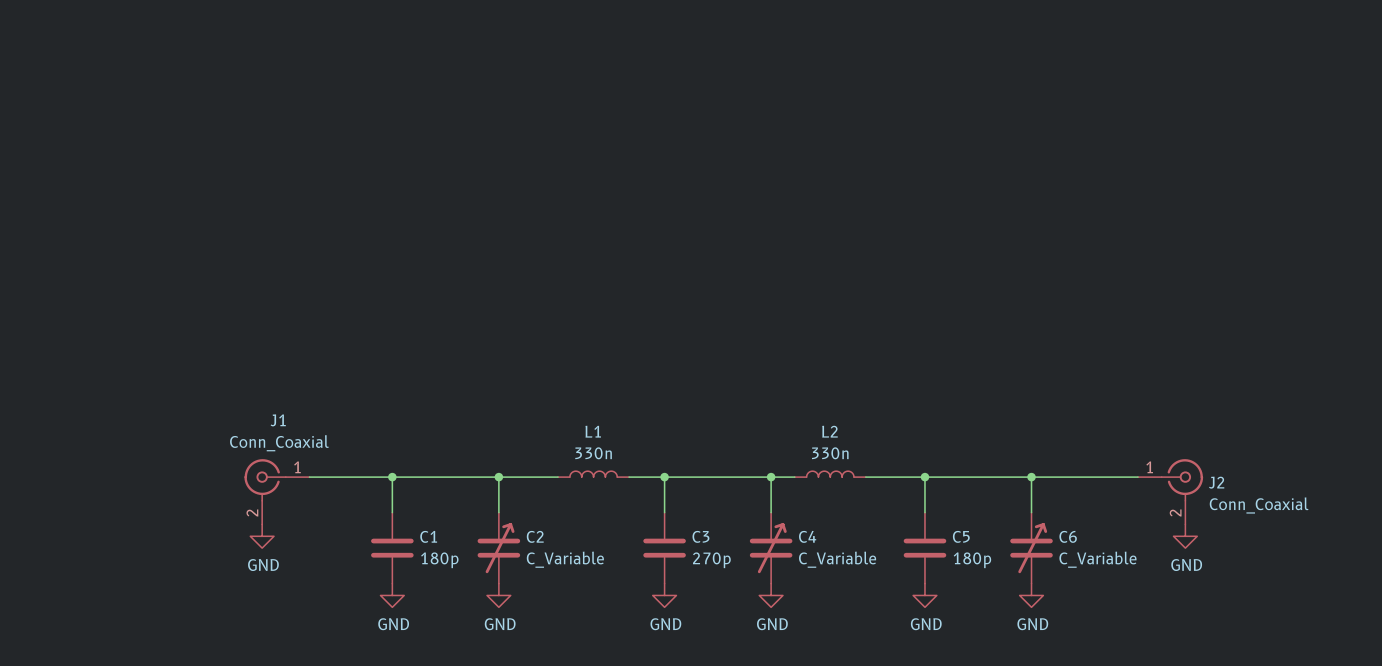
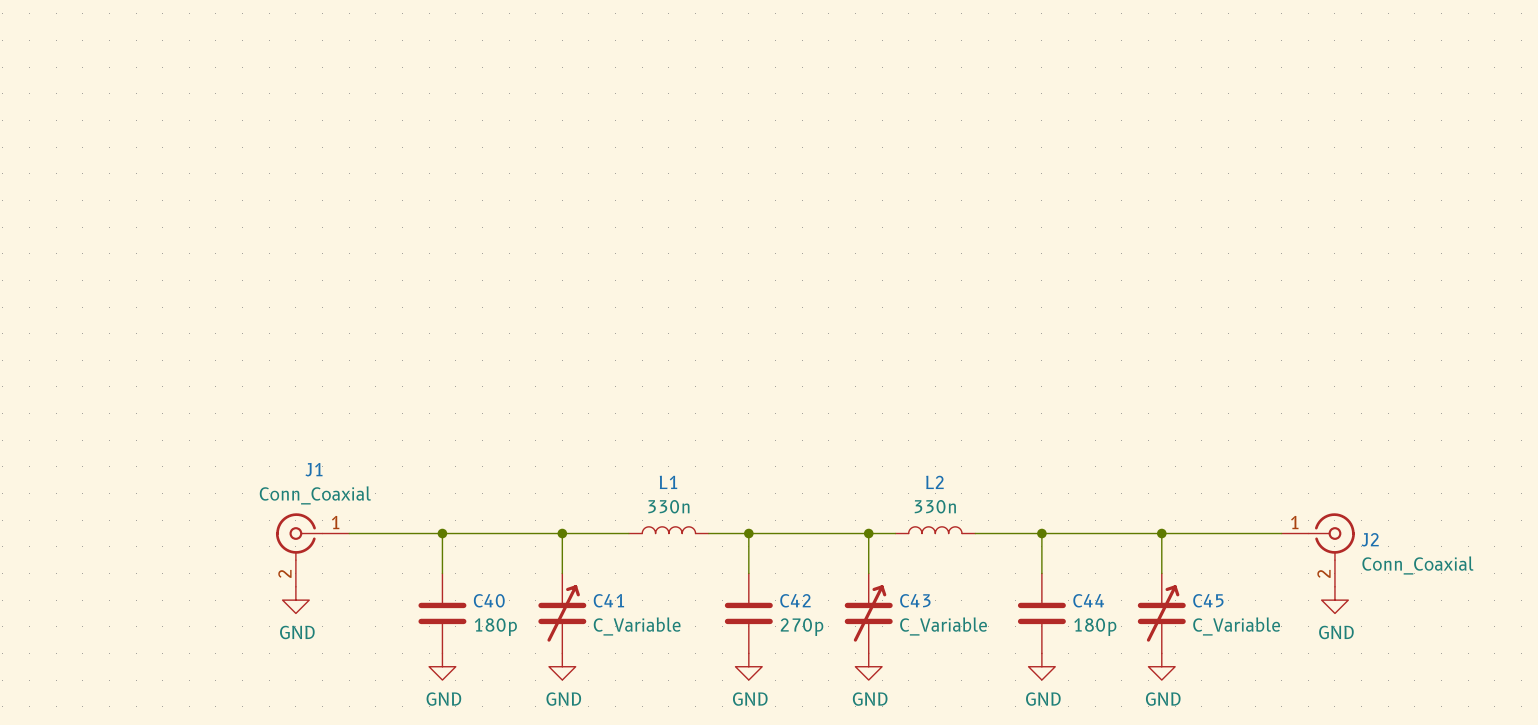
C1 name: C1 (428, 536) -> C40 (489, 600)
C2 name: C2 (535, 536) -> C41 (608, 600)
C3 name: C3 (700, 536) -> C42 (795, 600)
C4 name: C4 (807, 536) -> C43 (915, 600)
C5 name: C5 (961, 536) -> C44 (1088, 600)
C6 name: C6 (1068, 536) -> C45 (1208, 600)

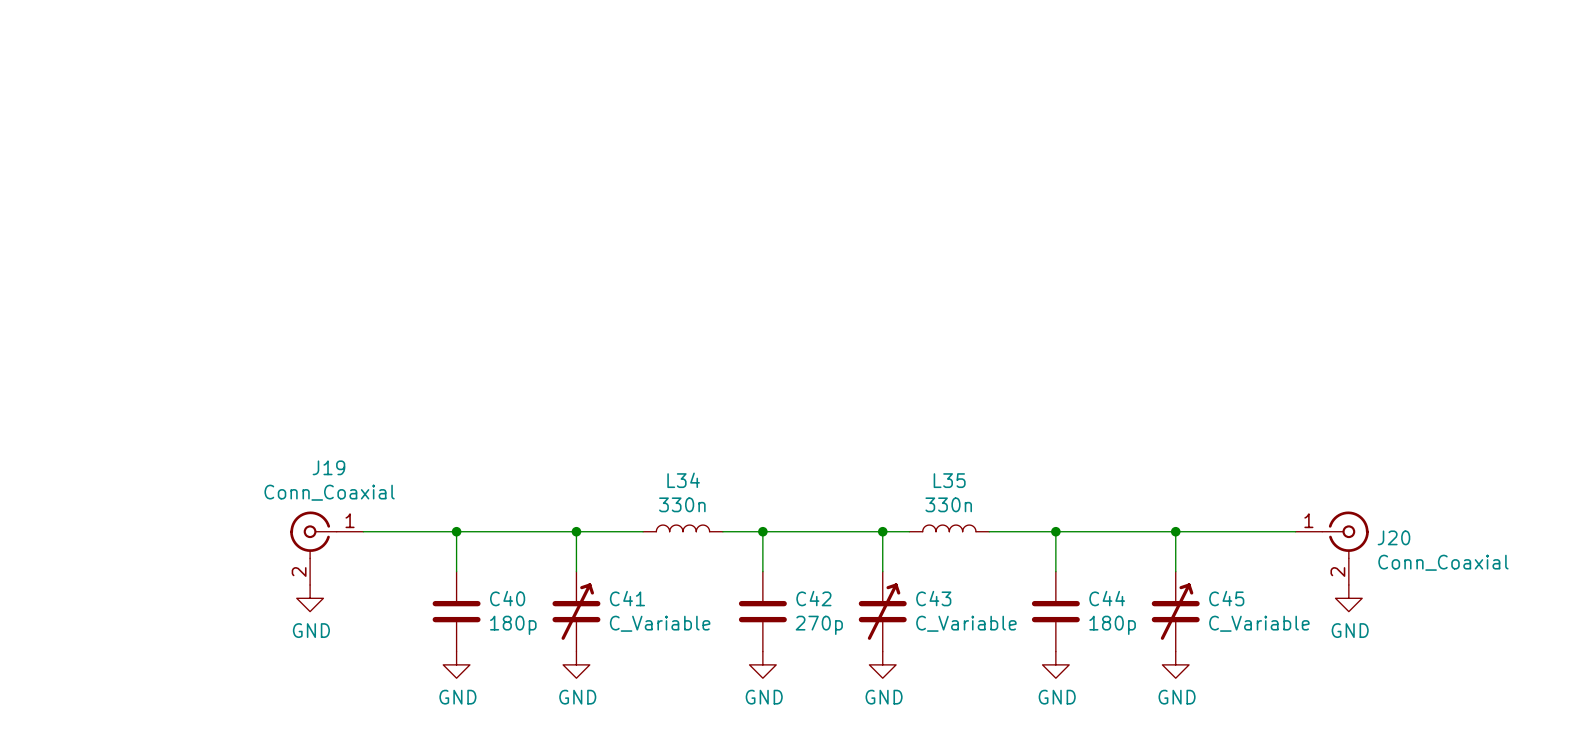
J1 name: J1 (313, 469) -> J19 (328, 467)
L1 name: L1 (668, 482) -> L34 (683, 480)
L2 name: L2 (934, 482) -> L35 (949, 480)
J2 name: J2 (1370, 539) -> J20 (1393, 537)

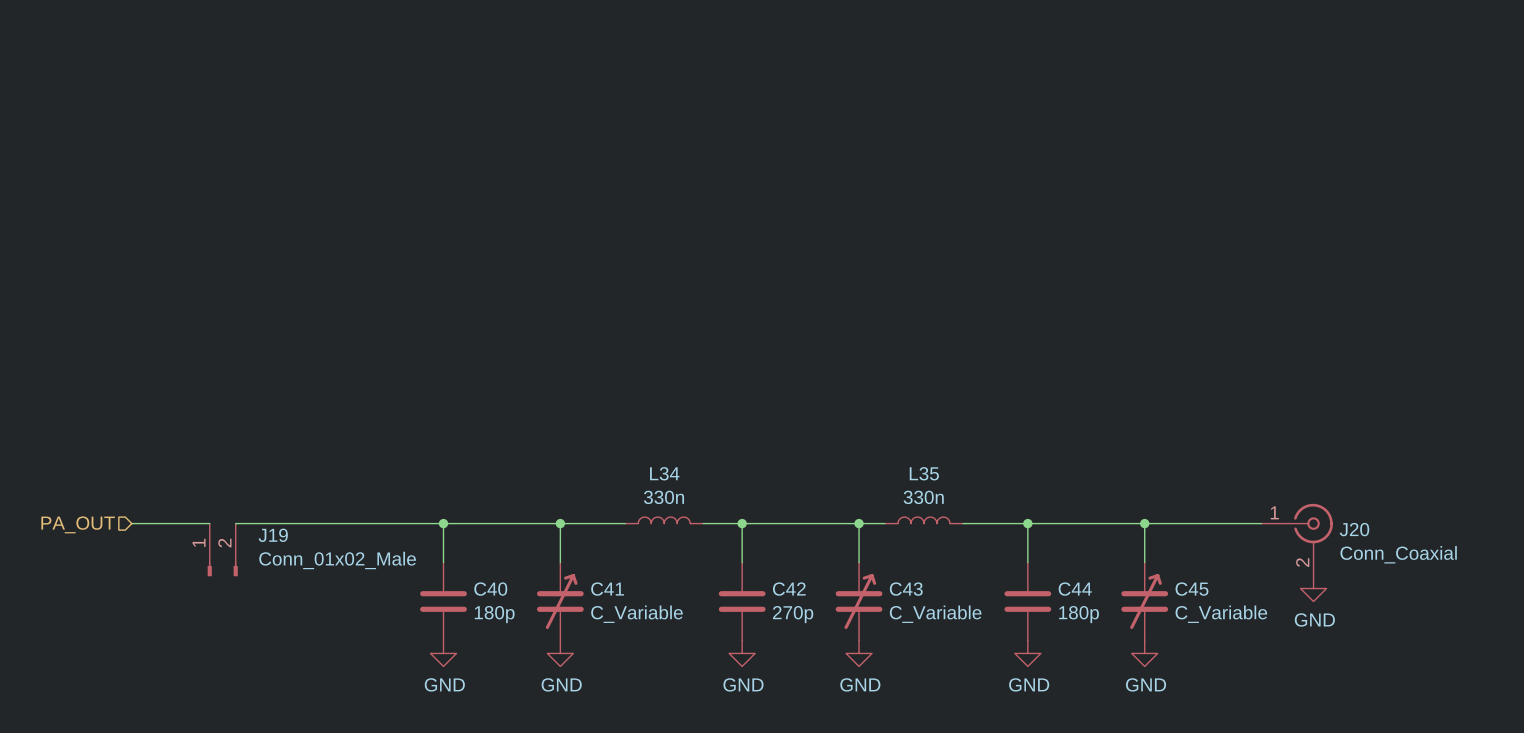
J19 name position: J19 (328, 467) -> J19 (273, 535)
J19 value: Conn_Coaxial (329, 492) -> Conn_01x02_Male (337, 560)
J19 symbol: [290, 511, 364, 585] -> [207, 523, 238, 577]
hierarchical label: none -> PA_OUT (78, 524)
wire: none -> (131, 523) (209, 523)
wire: none -> (235, 523) (352, 523)
power symbol: GND (310, 598) -> none

